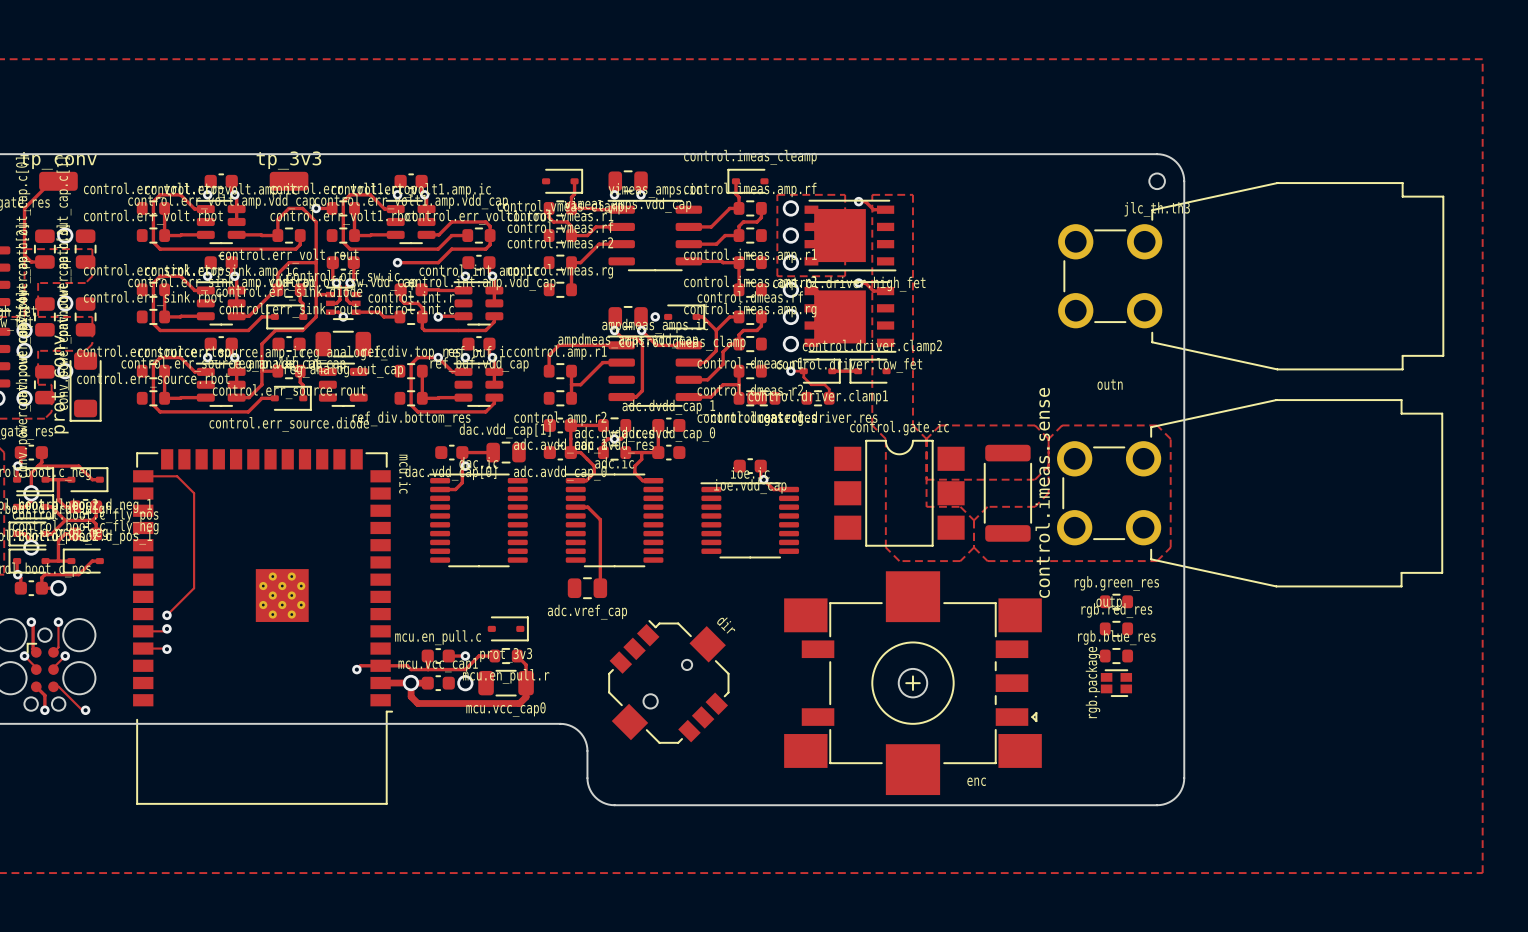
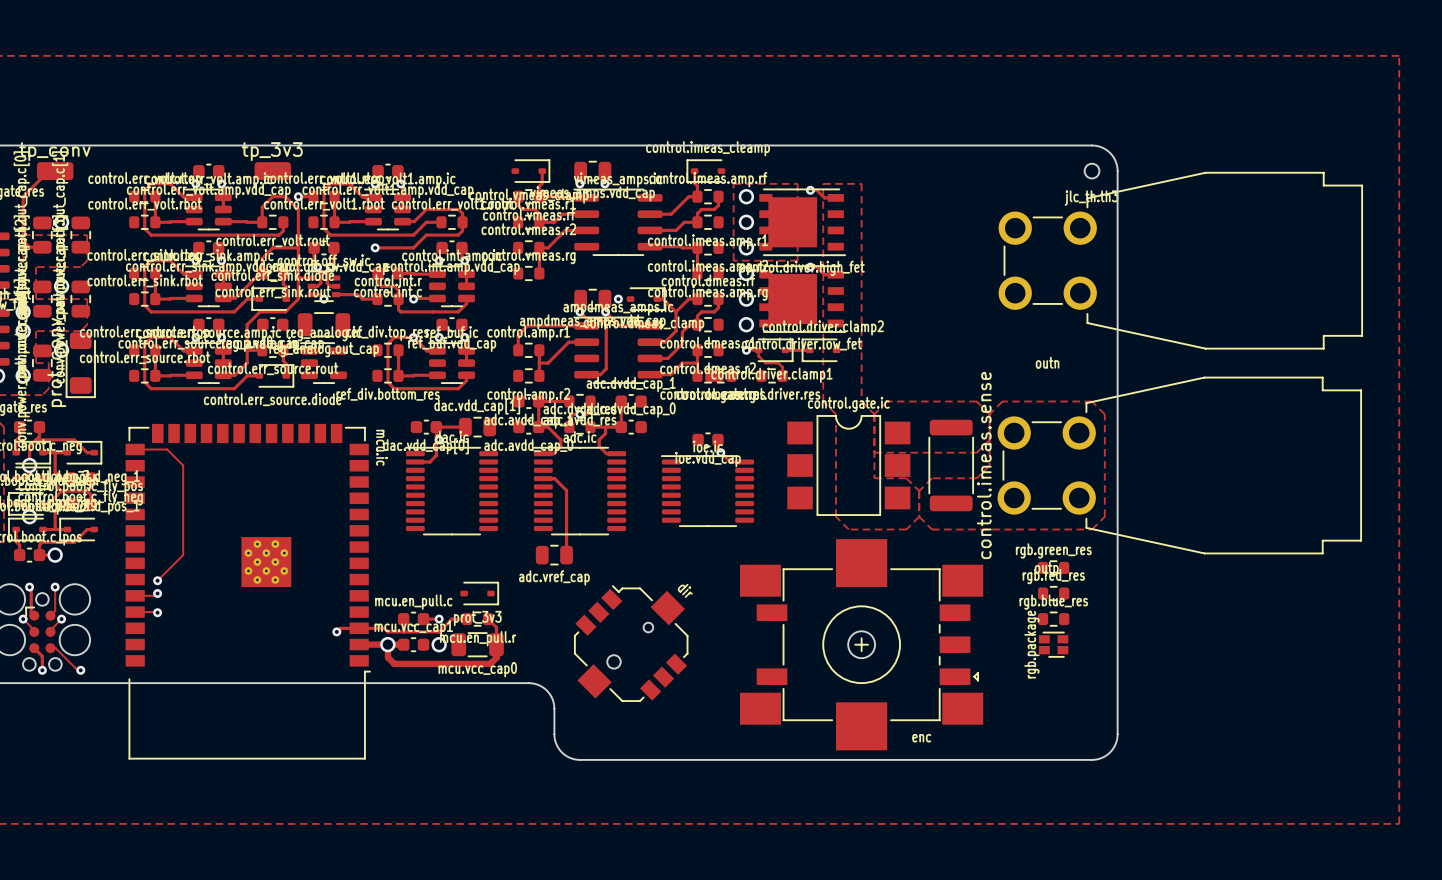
via: (17, 466) -> none
via: (17, 574) -> none

